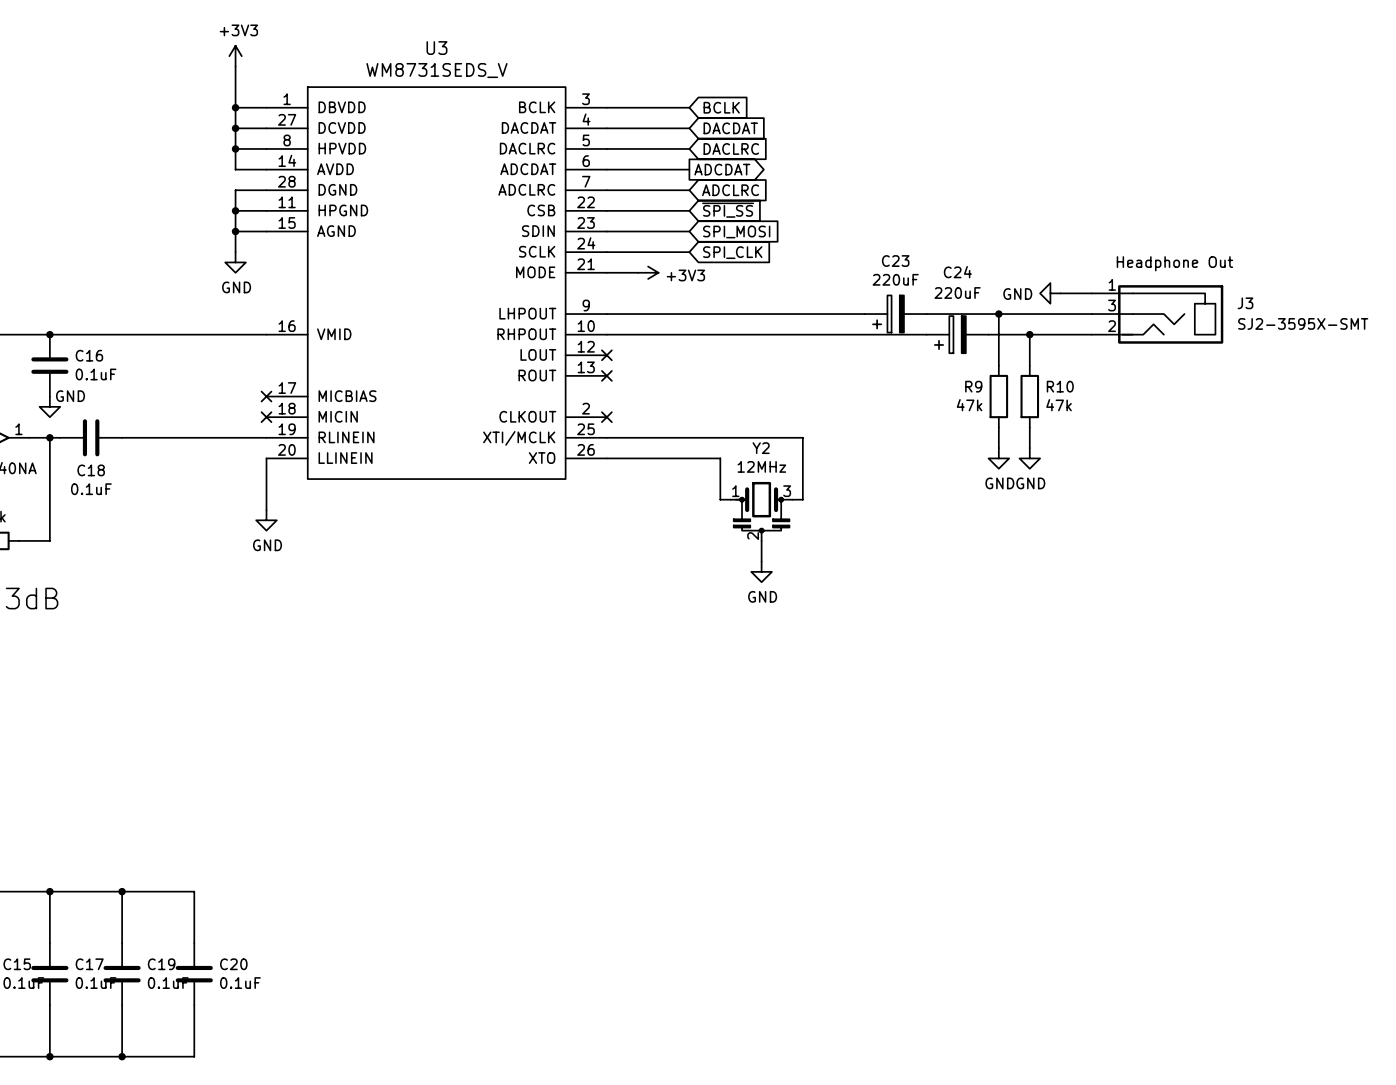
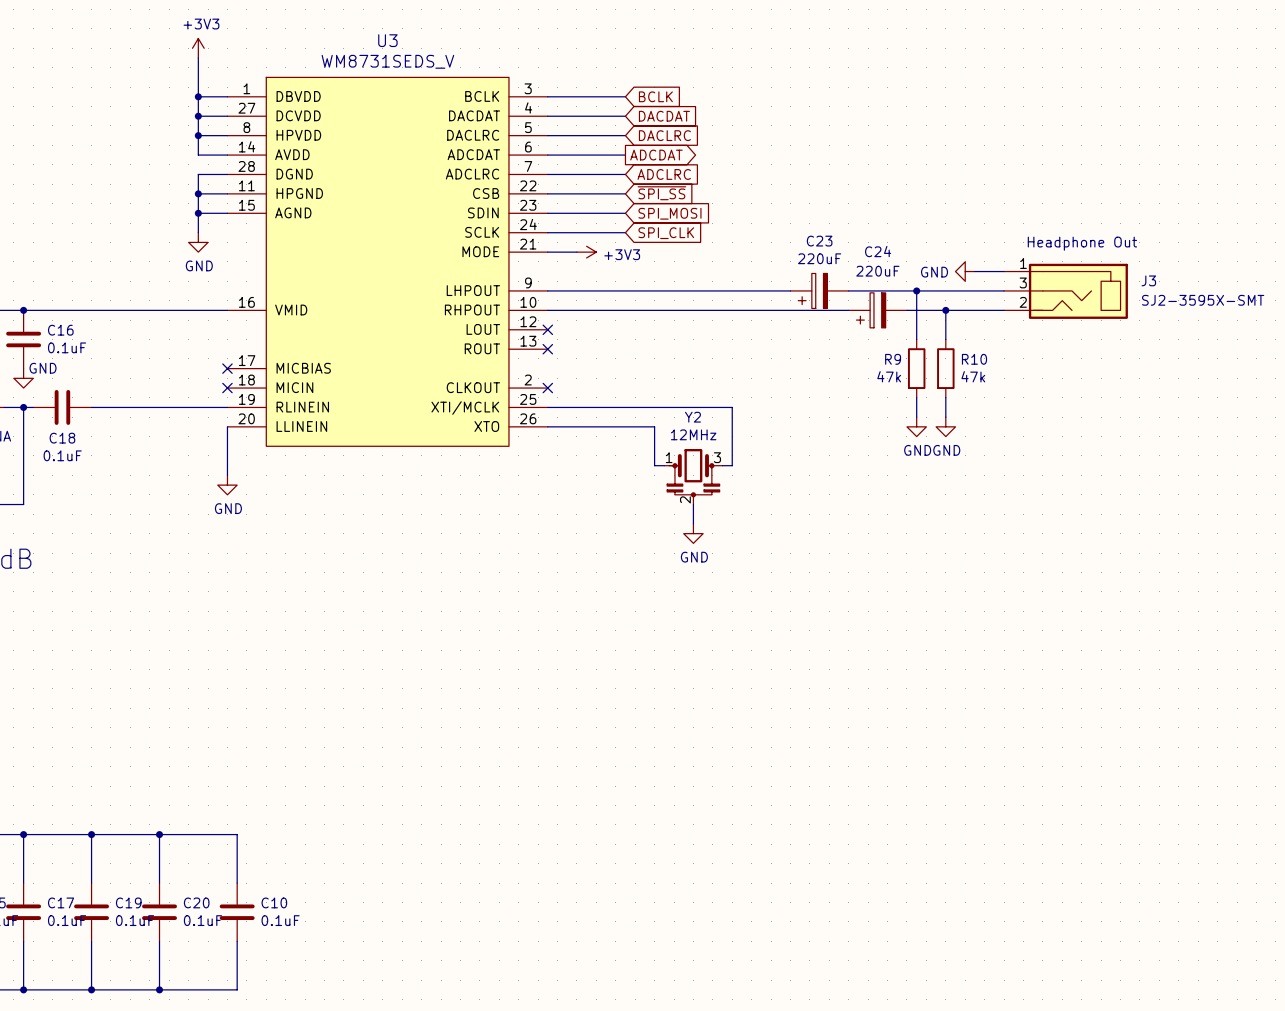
wire: none -> (159, 834) (237, 834) (237, 883)
junction: none -> (159, 834)
C10: none -> 0.1uF (237, 912)
wire: none -> (237, 941) (237, 989) (159, 989)
junction: none -> (159, 989)

